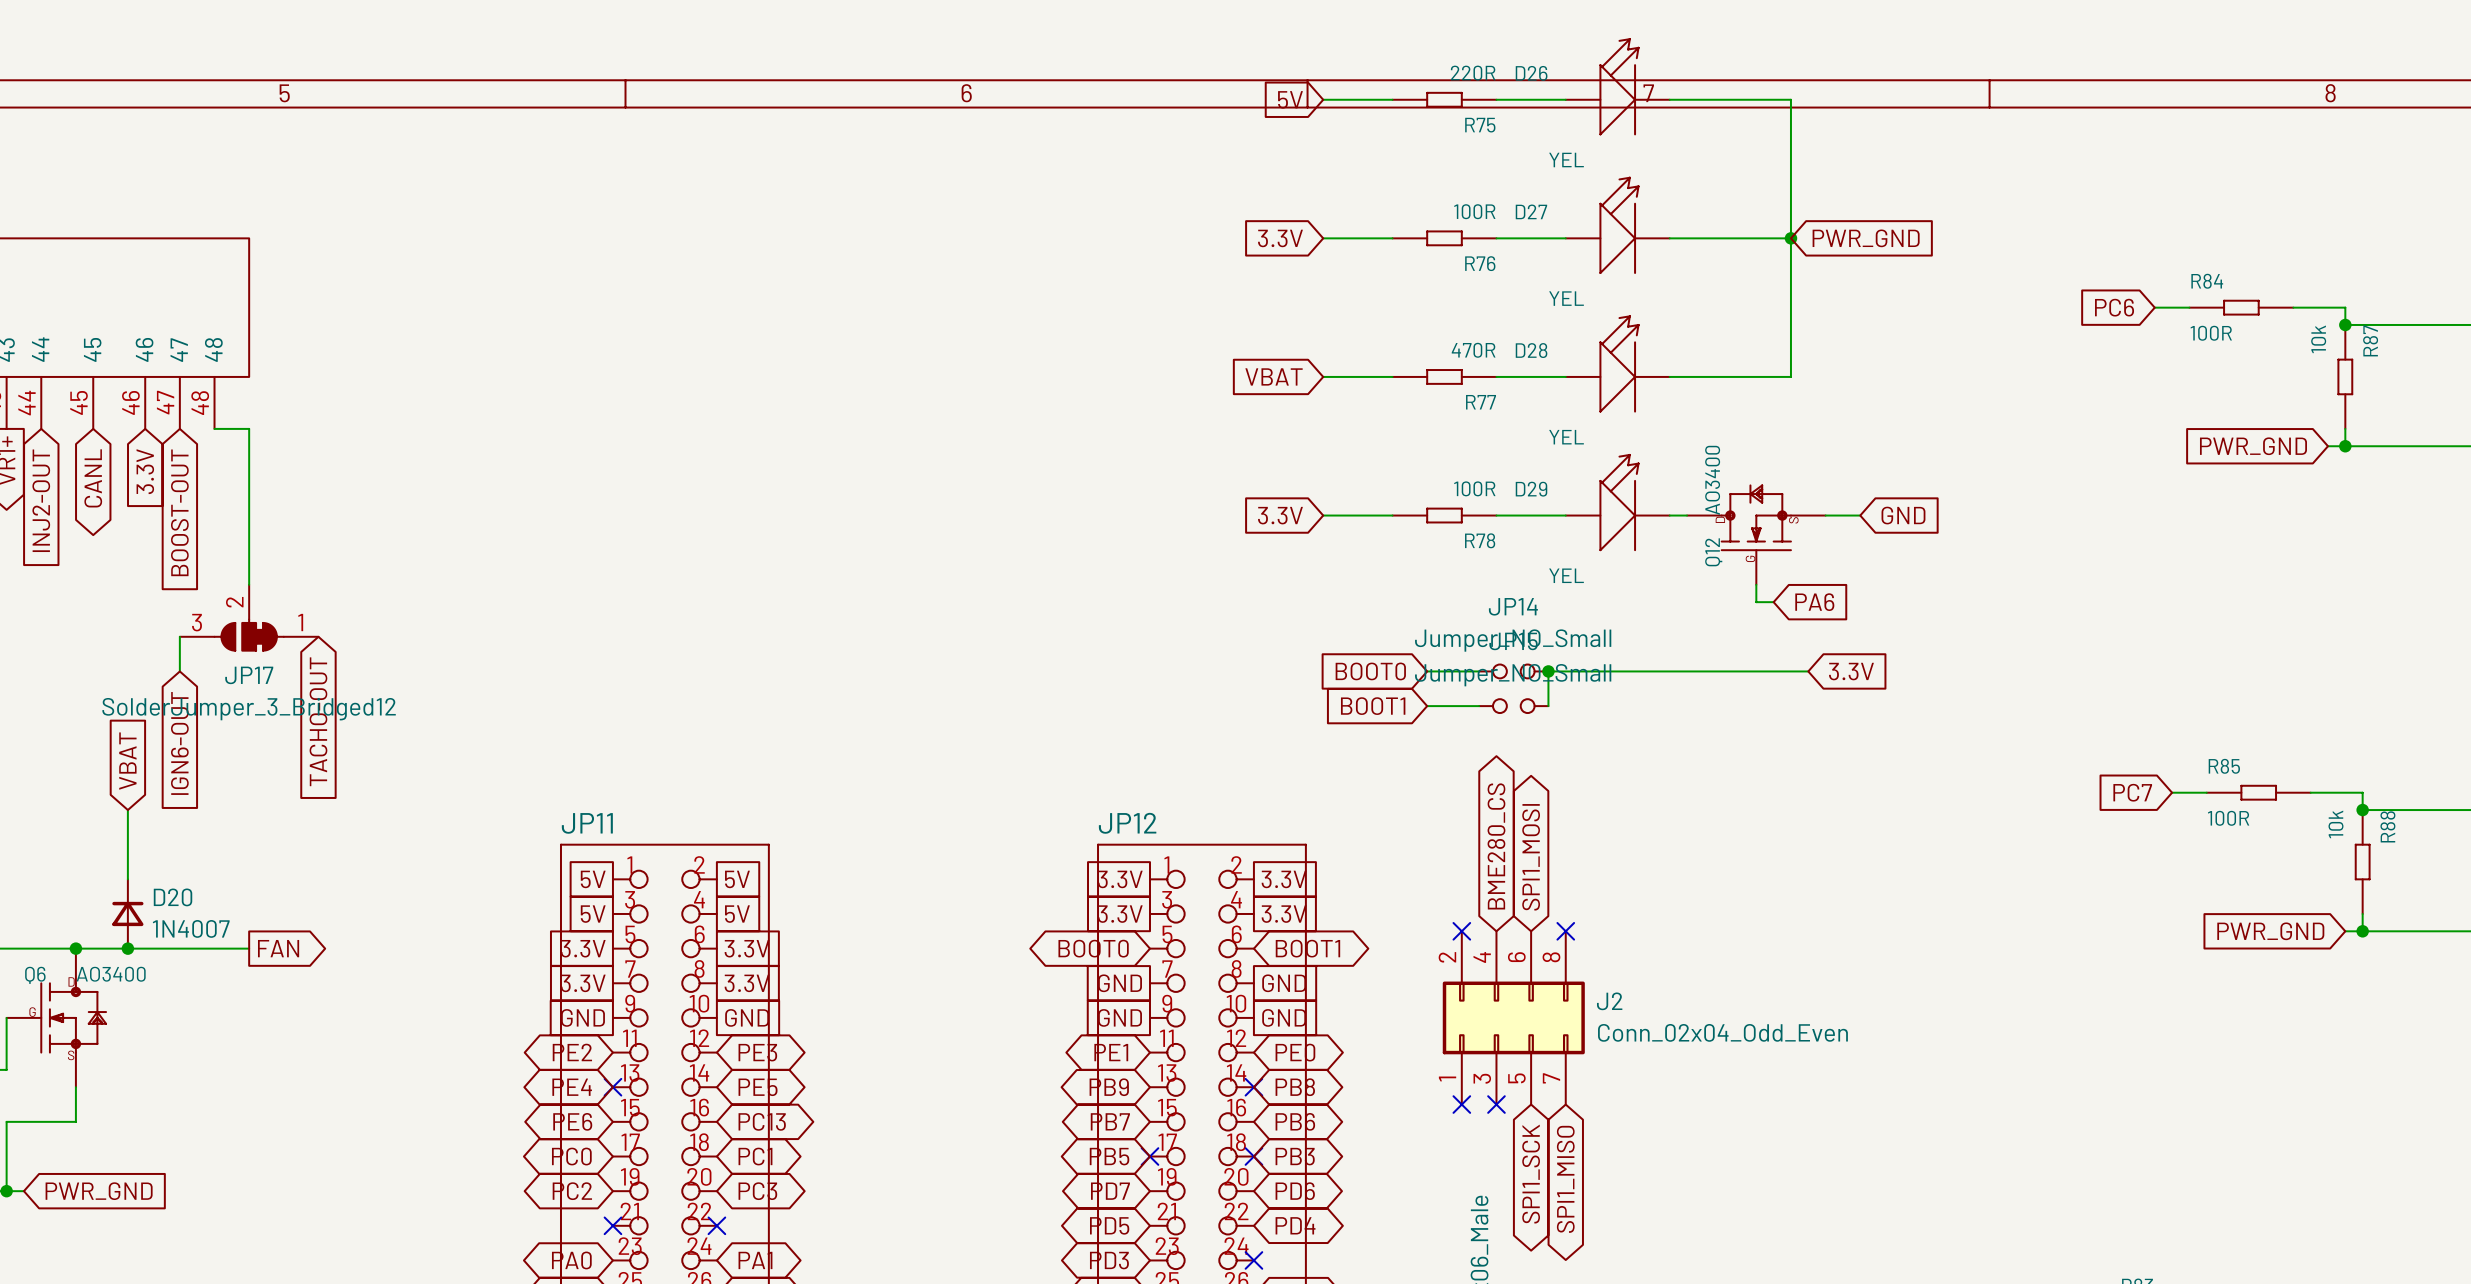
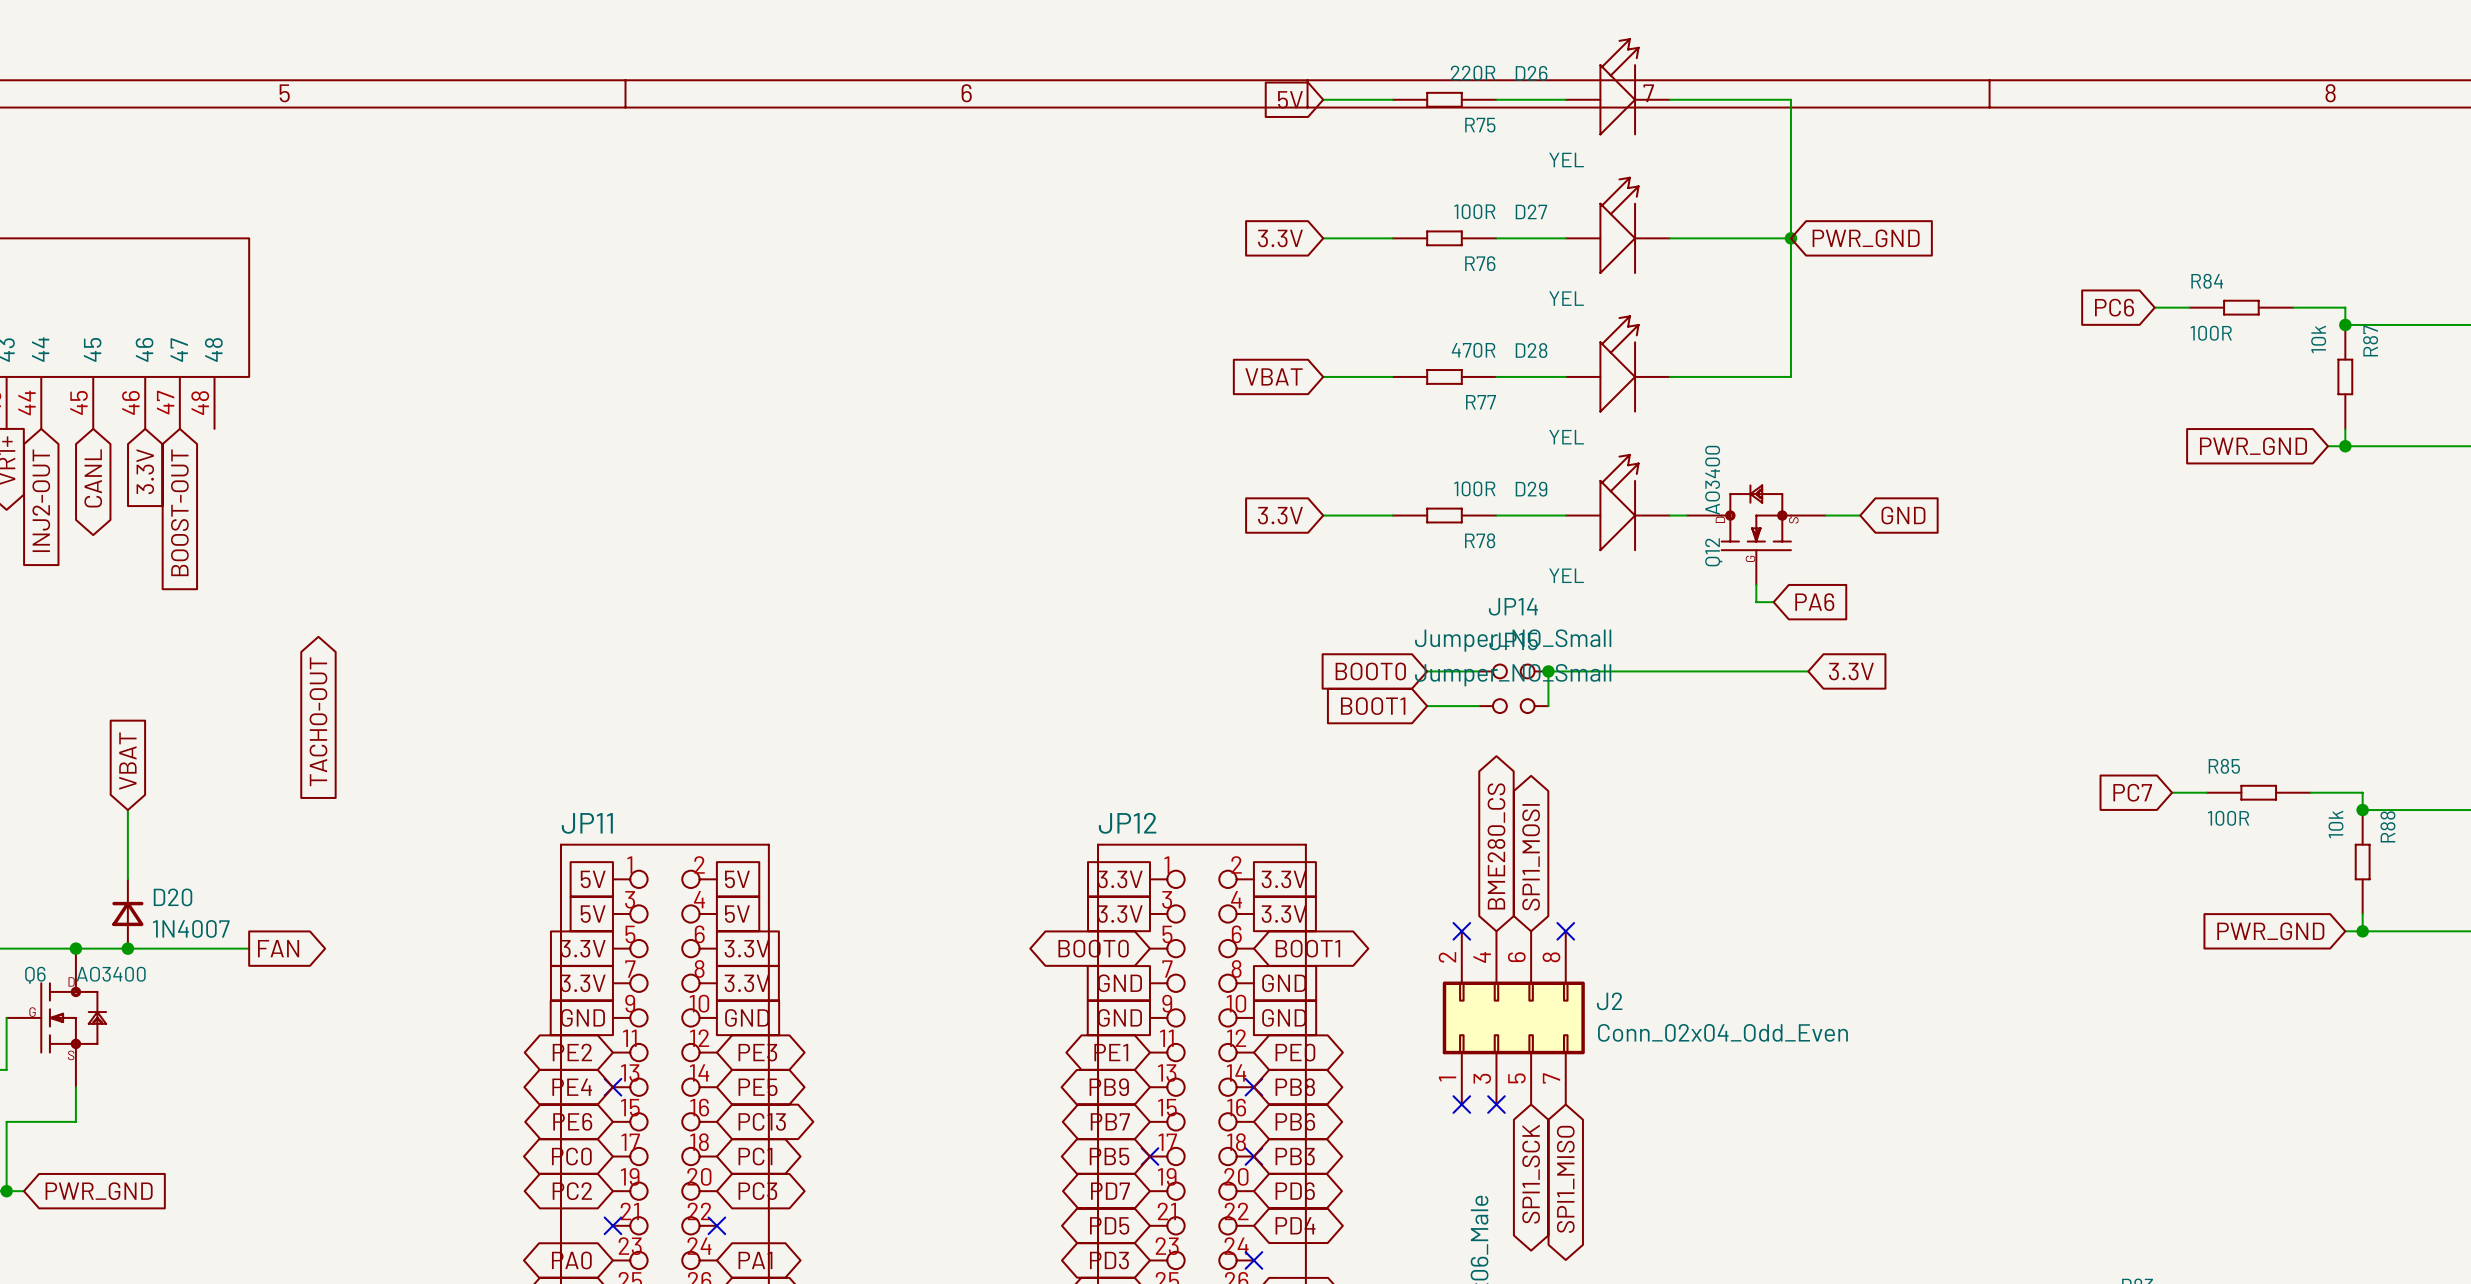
wire: (214, 428) (249, 428) (249, 584) -> none
JP17: SolderJumper_3_Bridged12 (249, 617) -> none
wire: (179, 636) (179, 671) -> none
global label: IGN6-OUT (179, 743) -> none

